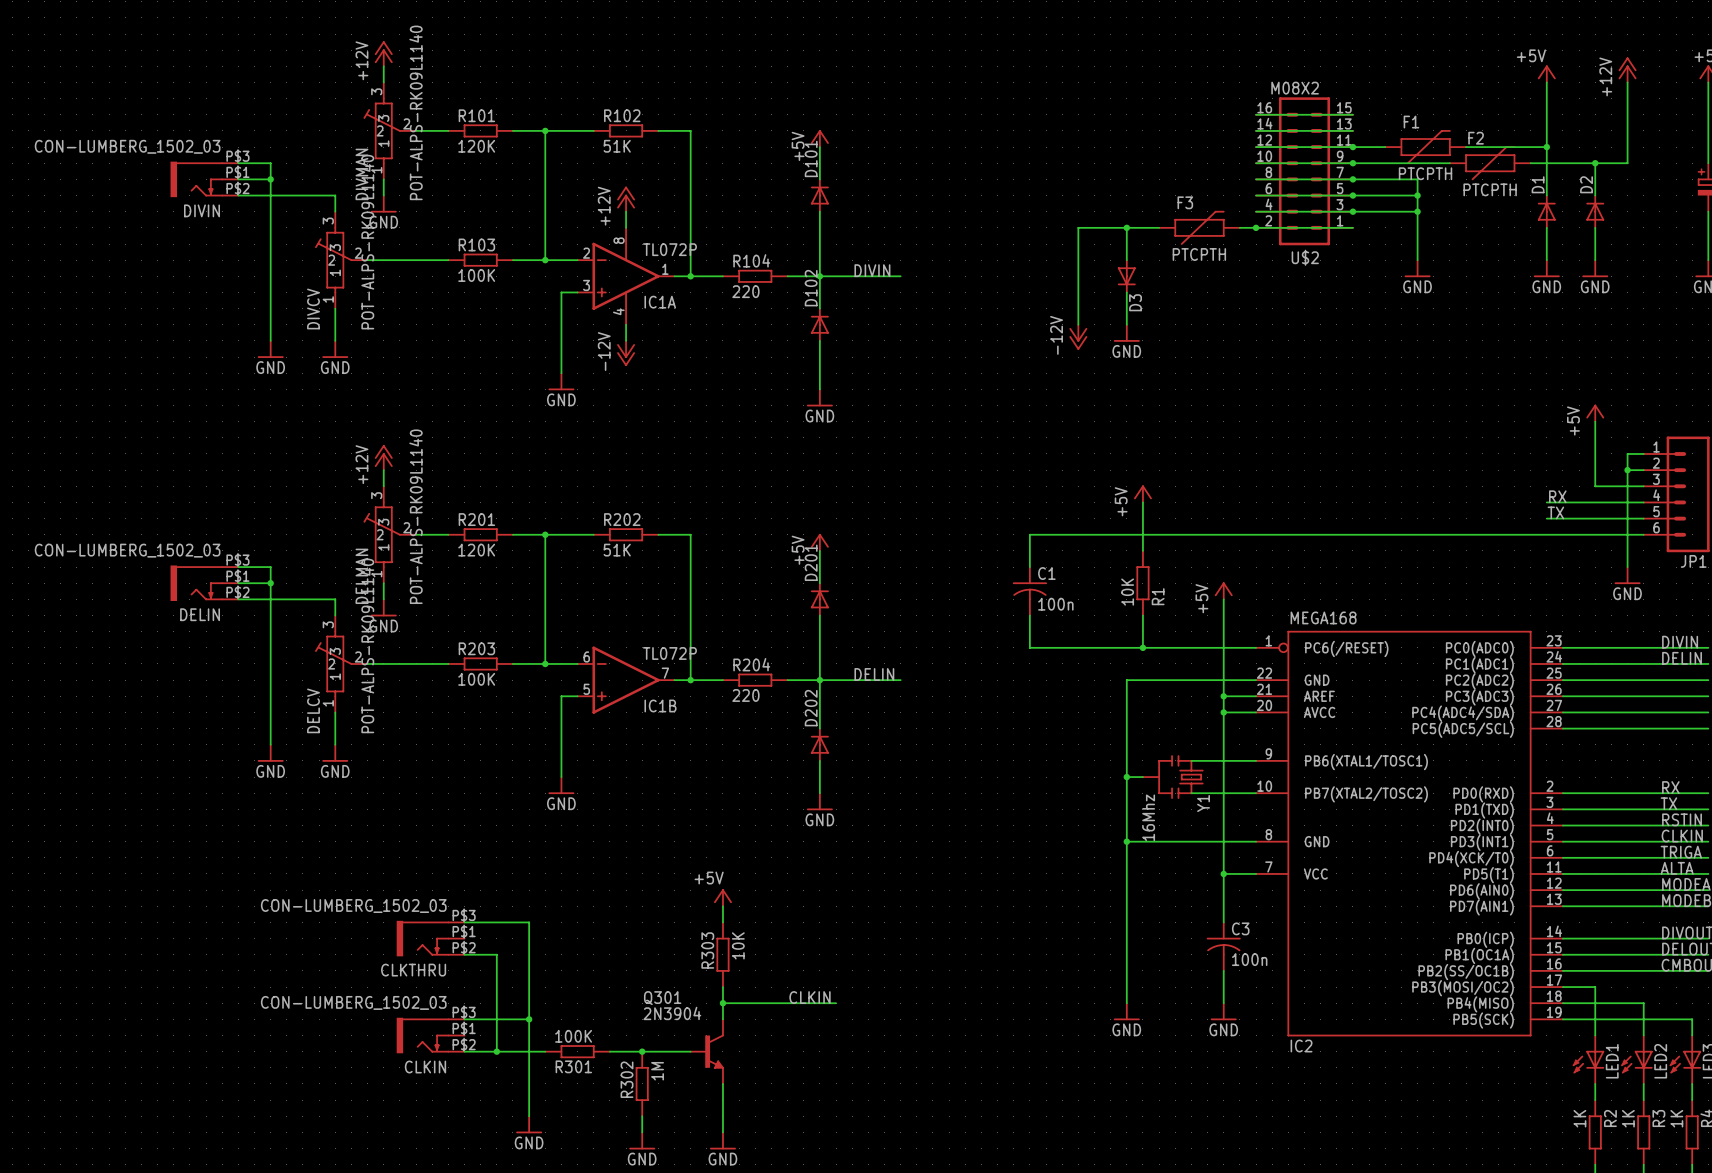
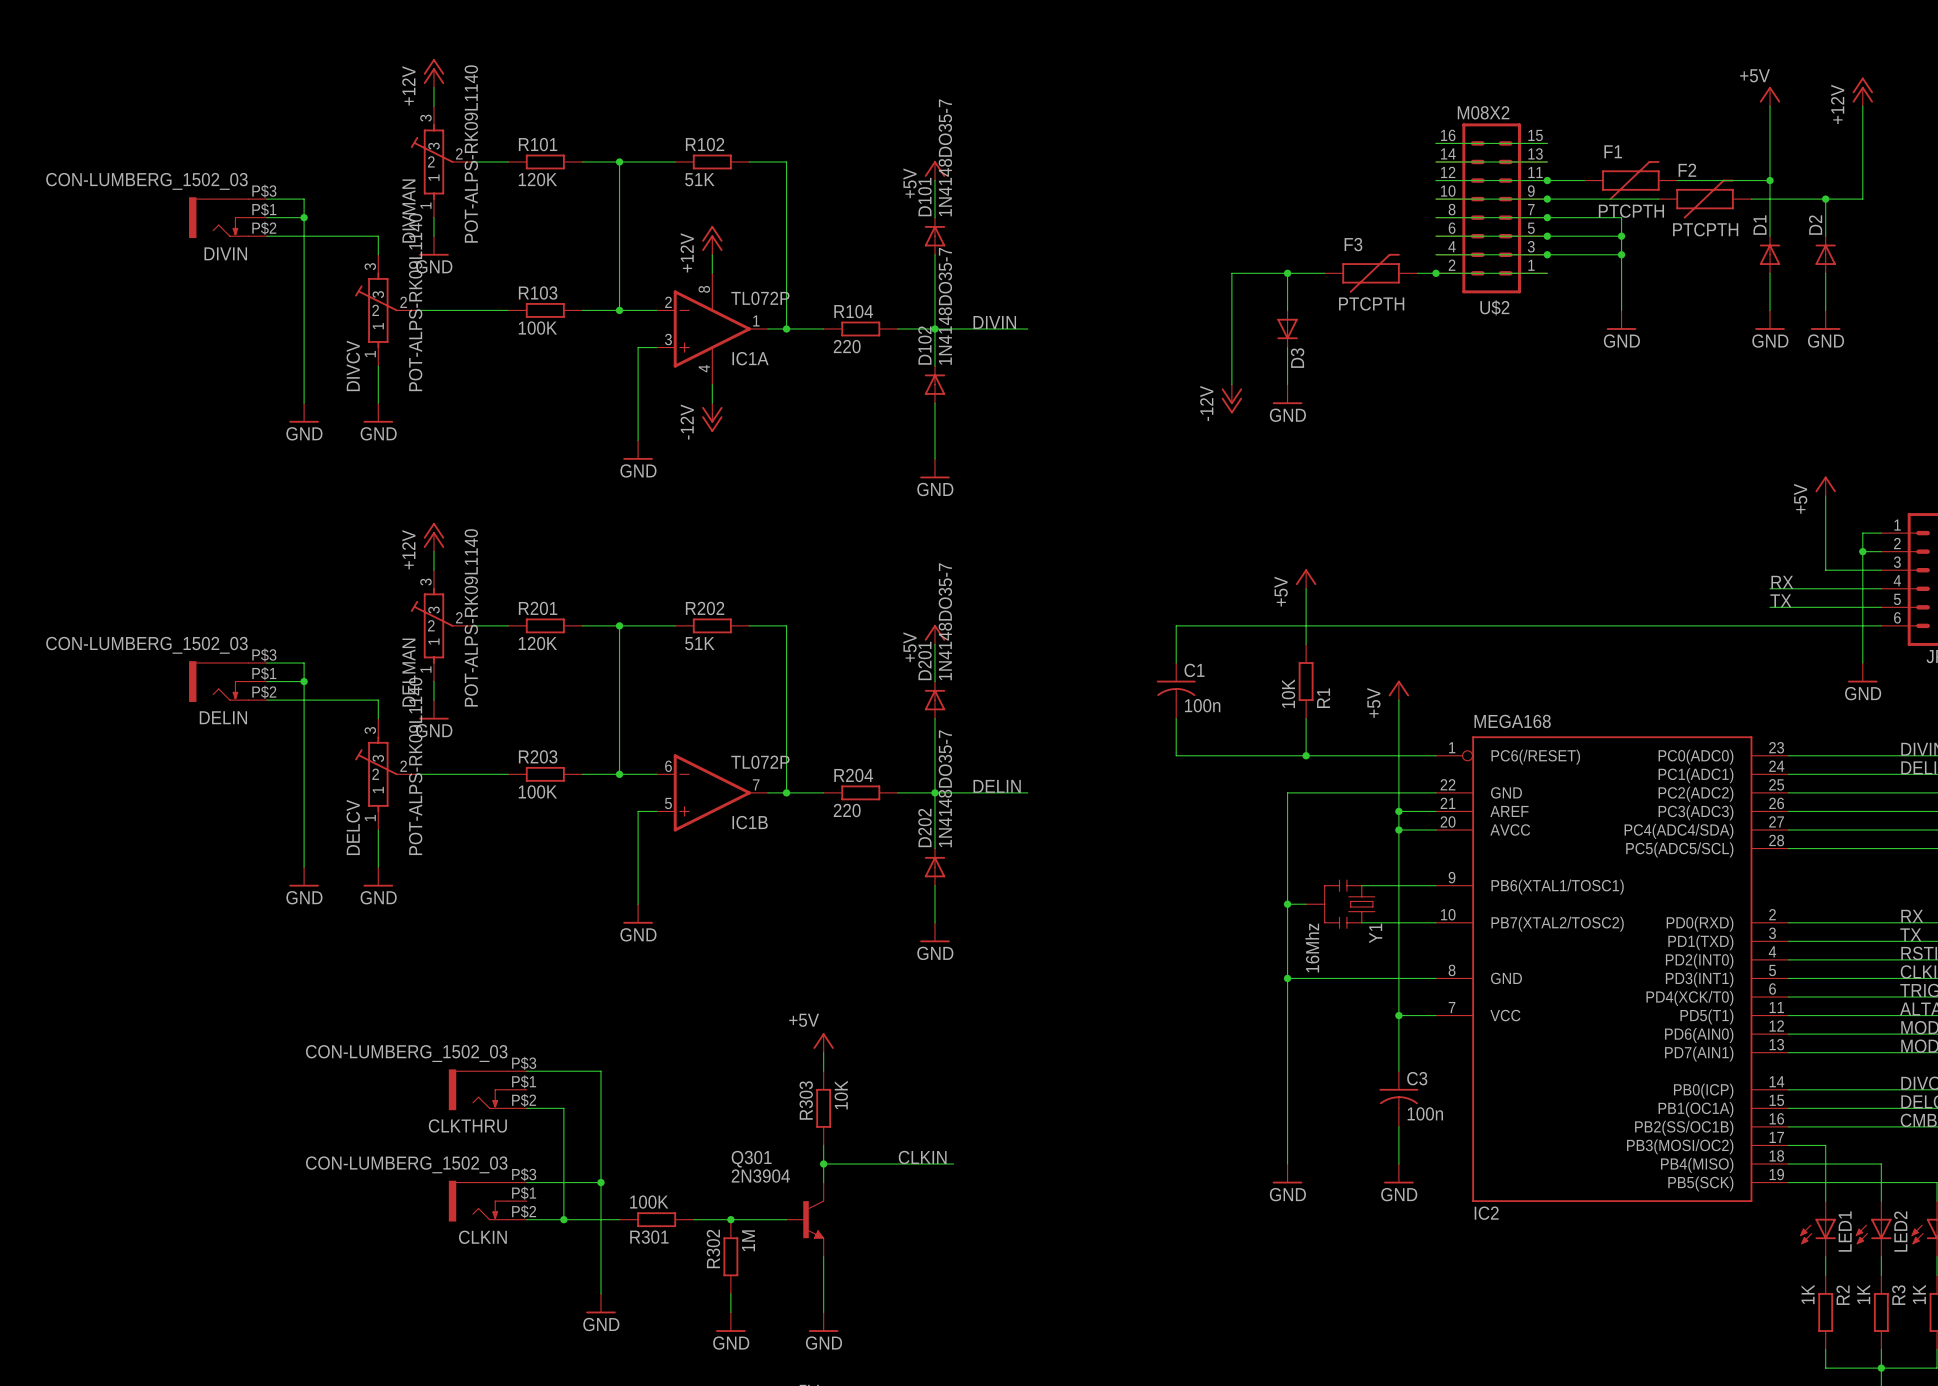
D101 value: none -> 1N4148DO35-7 (945, 157)
D102 value: none -> 1N4148DO35-7 (945, 306)
D201 value: none -> 1N4148DO35-7 (945, 621)
D202 value: none -> 1N4148DO35-7 (945, 788)

